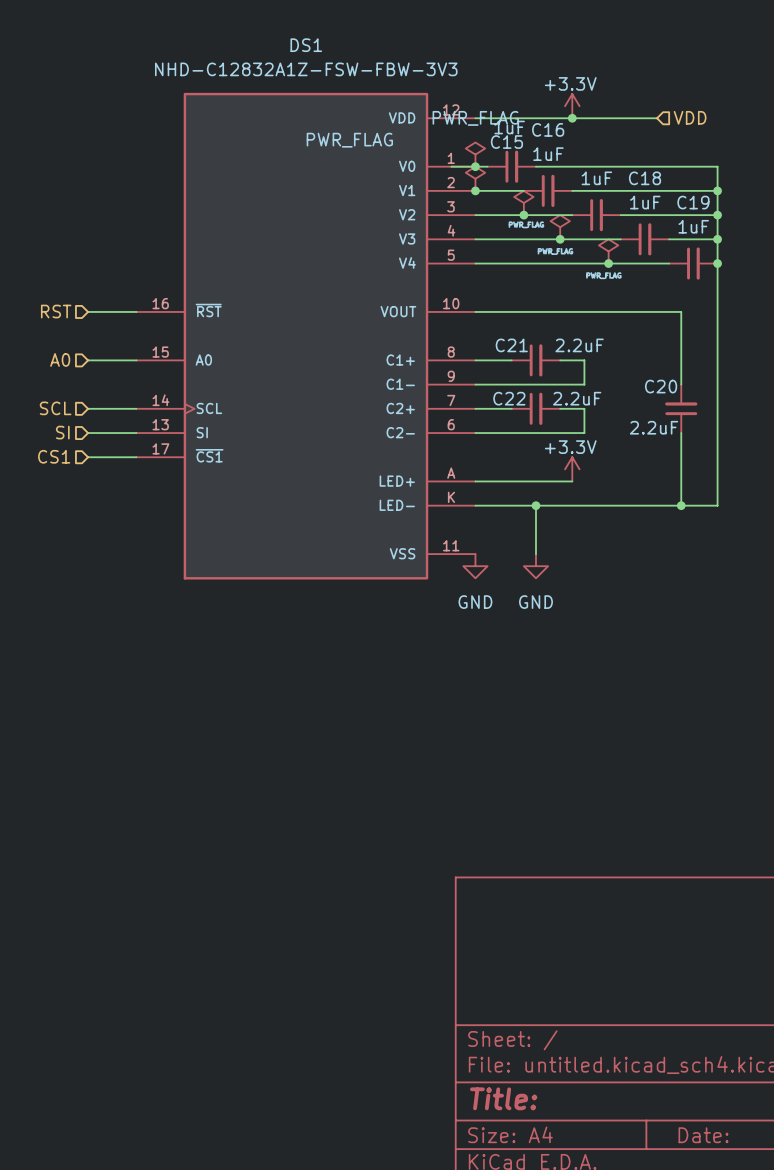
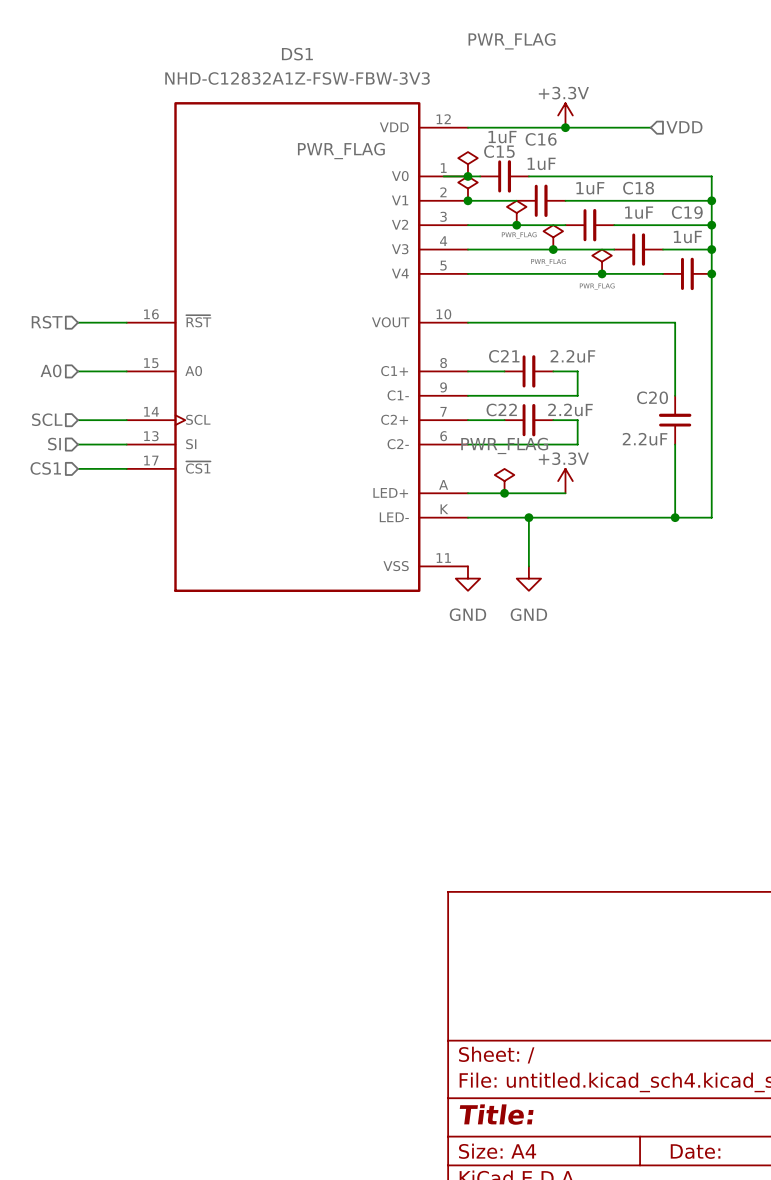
power symbol text position: PWR_FLAG (475, 118) -> PWR_FLAG (511, 41)
power symbol: none -> PWR_FLAG (504, 481)
junction: none -> (504, 493)

